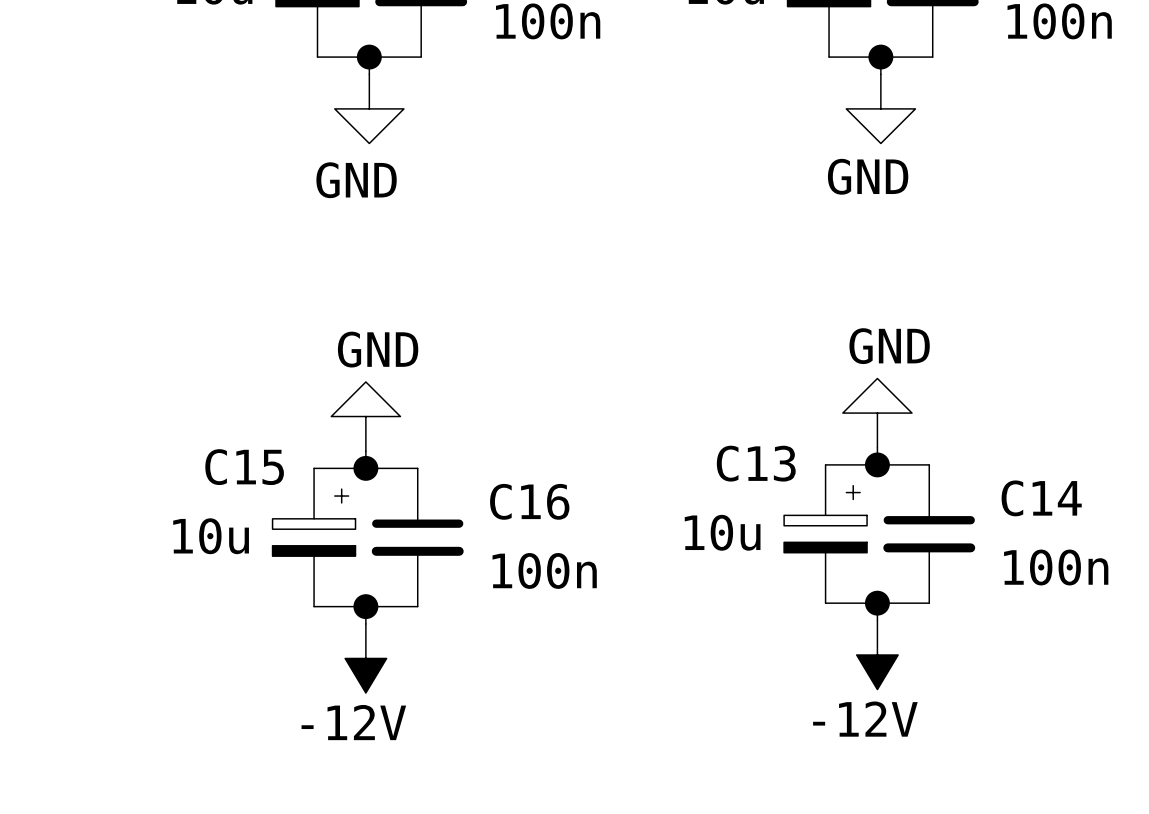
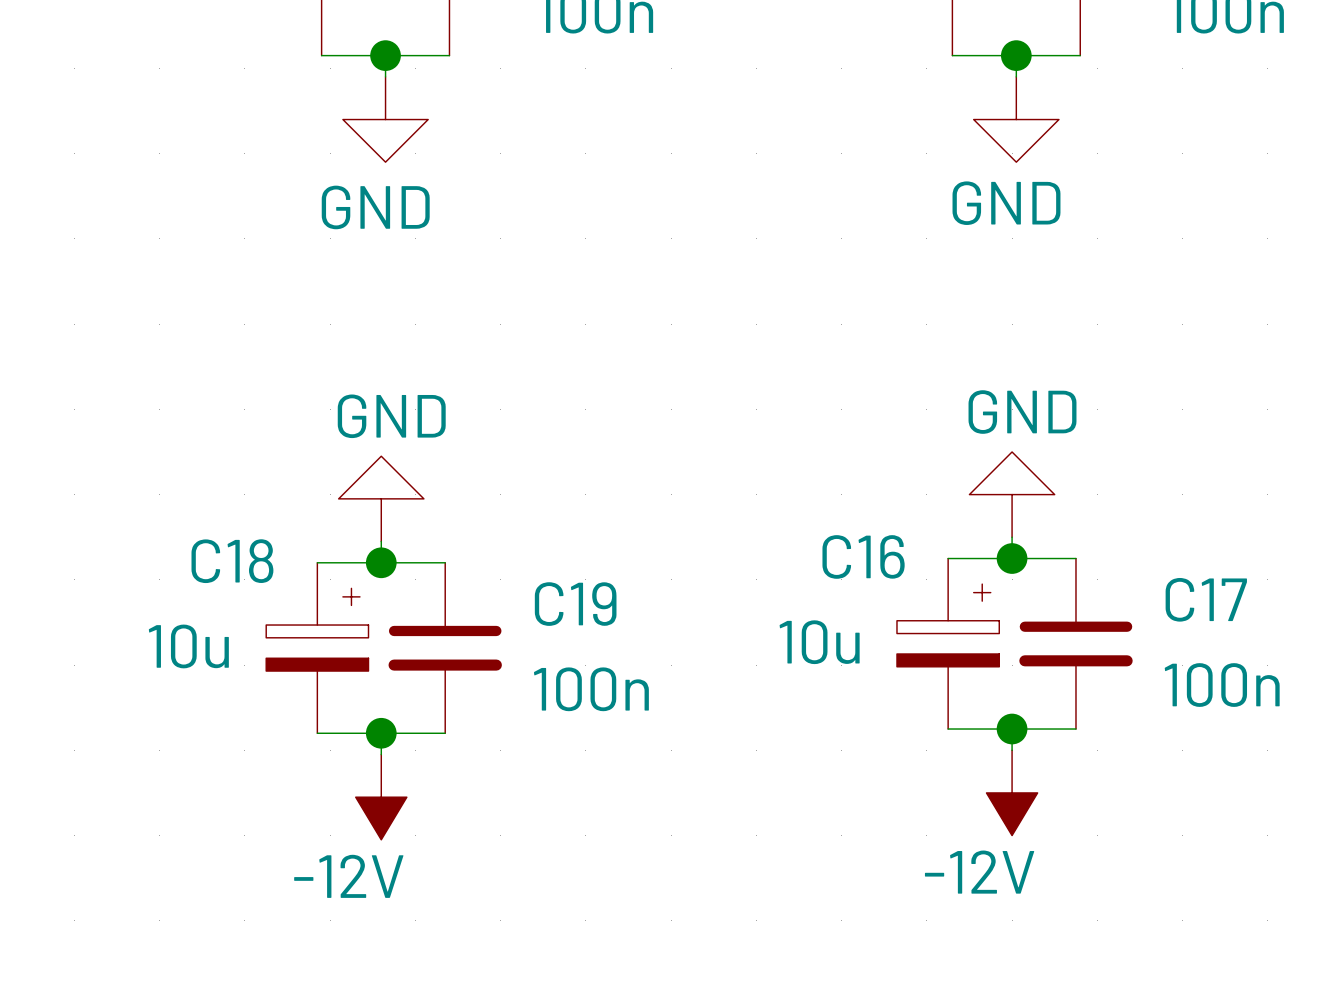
C13 name: C13 (756, 463) -> C16 (863, 556)
C15 name: C15 (244, 467) -> C18 (232, 561)
C14 name: C14 (1041, 498) -> C17 (1206, 599)
C16 name: C16 (529, 501) -> C19 (575, 604)

